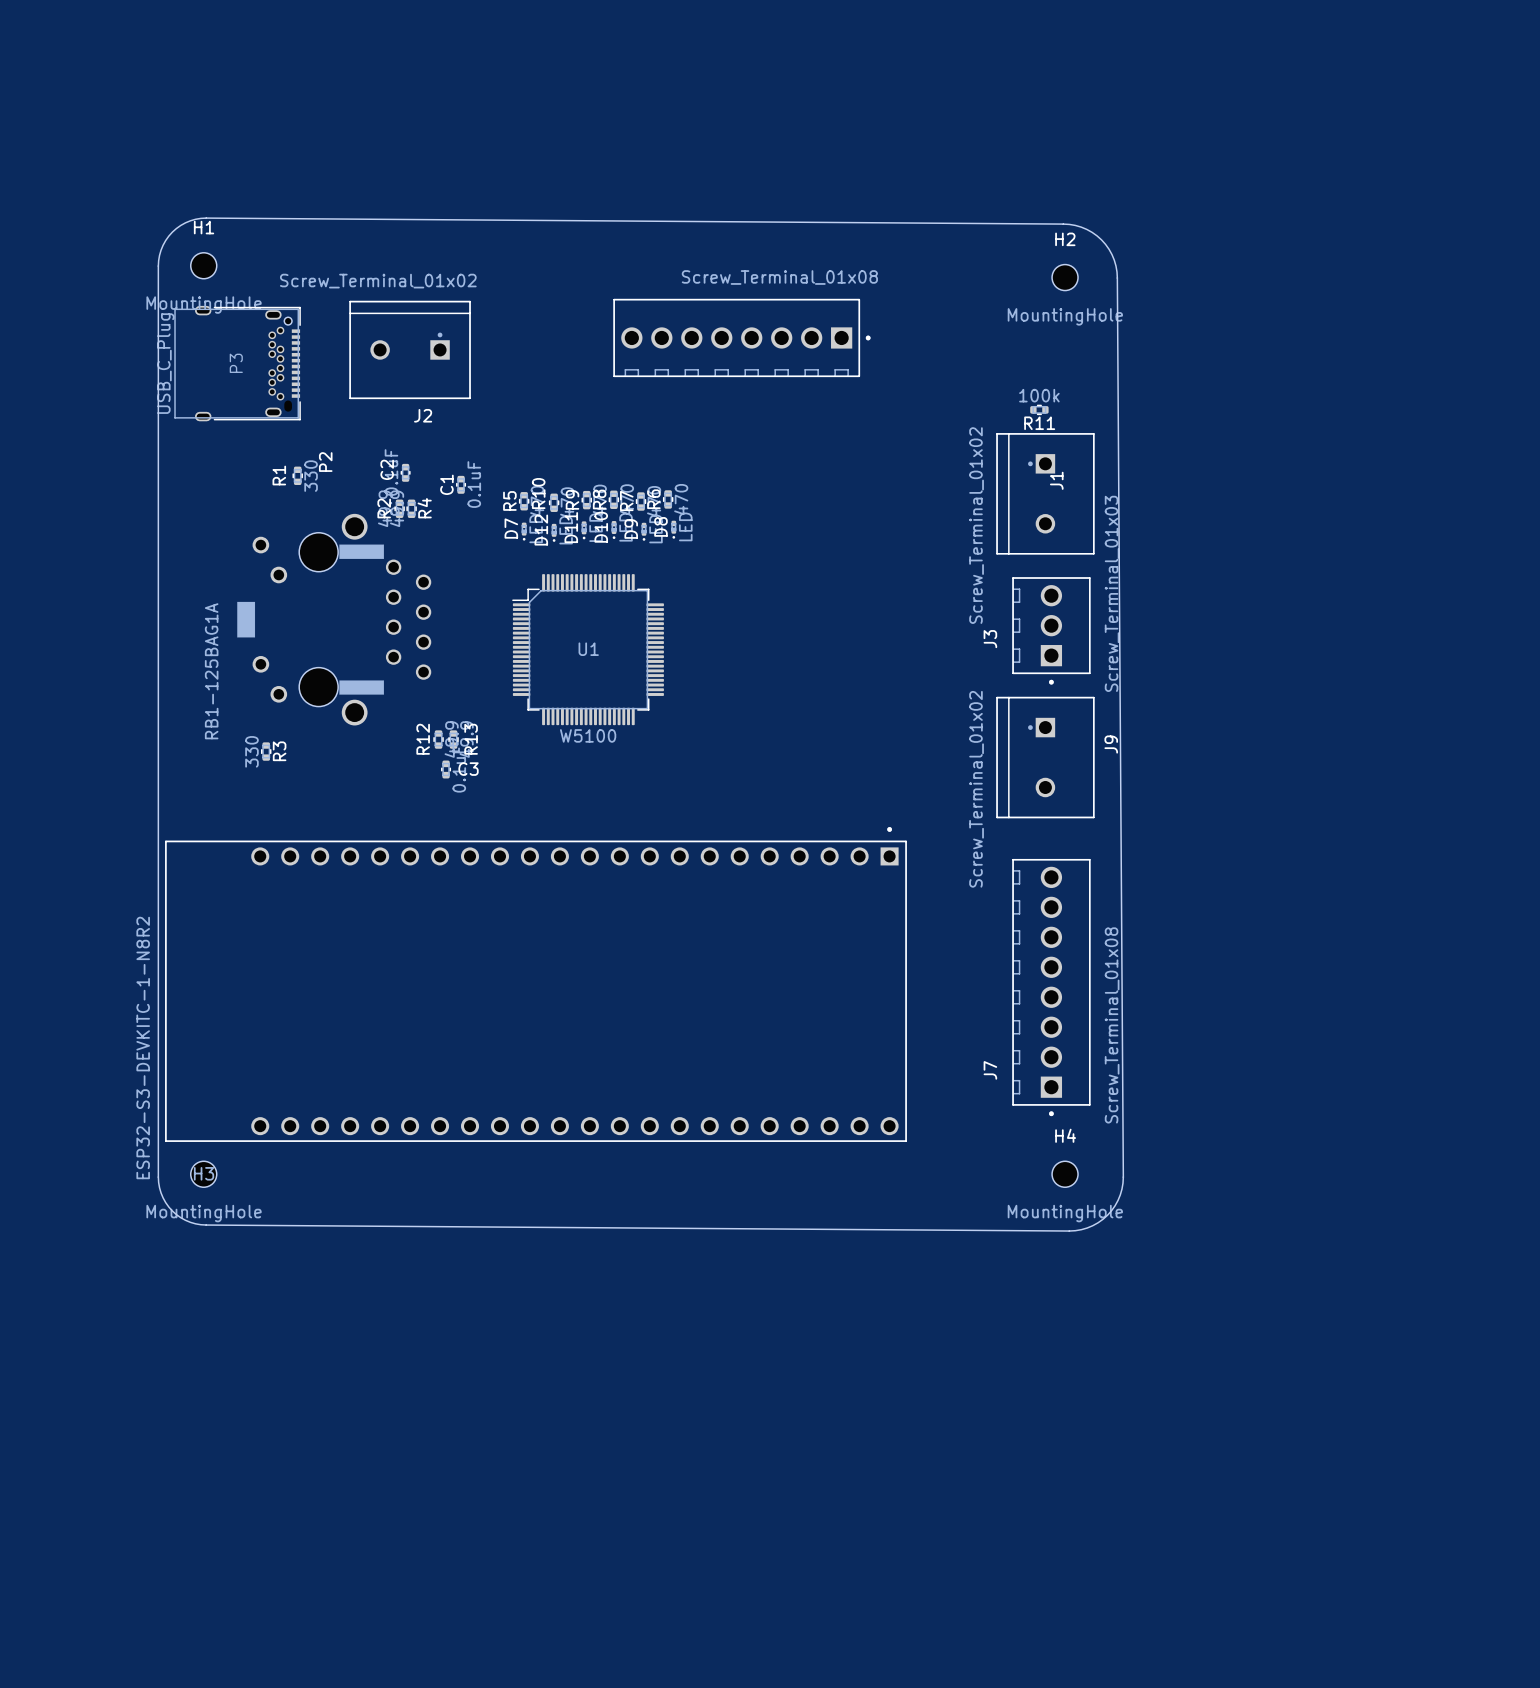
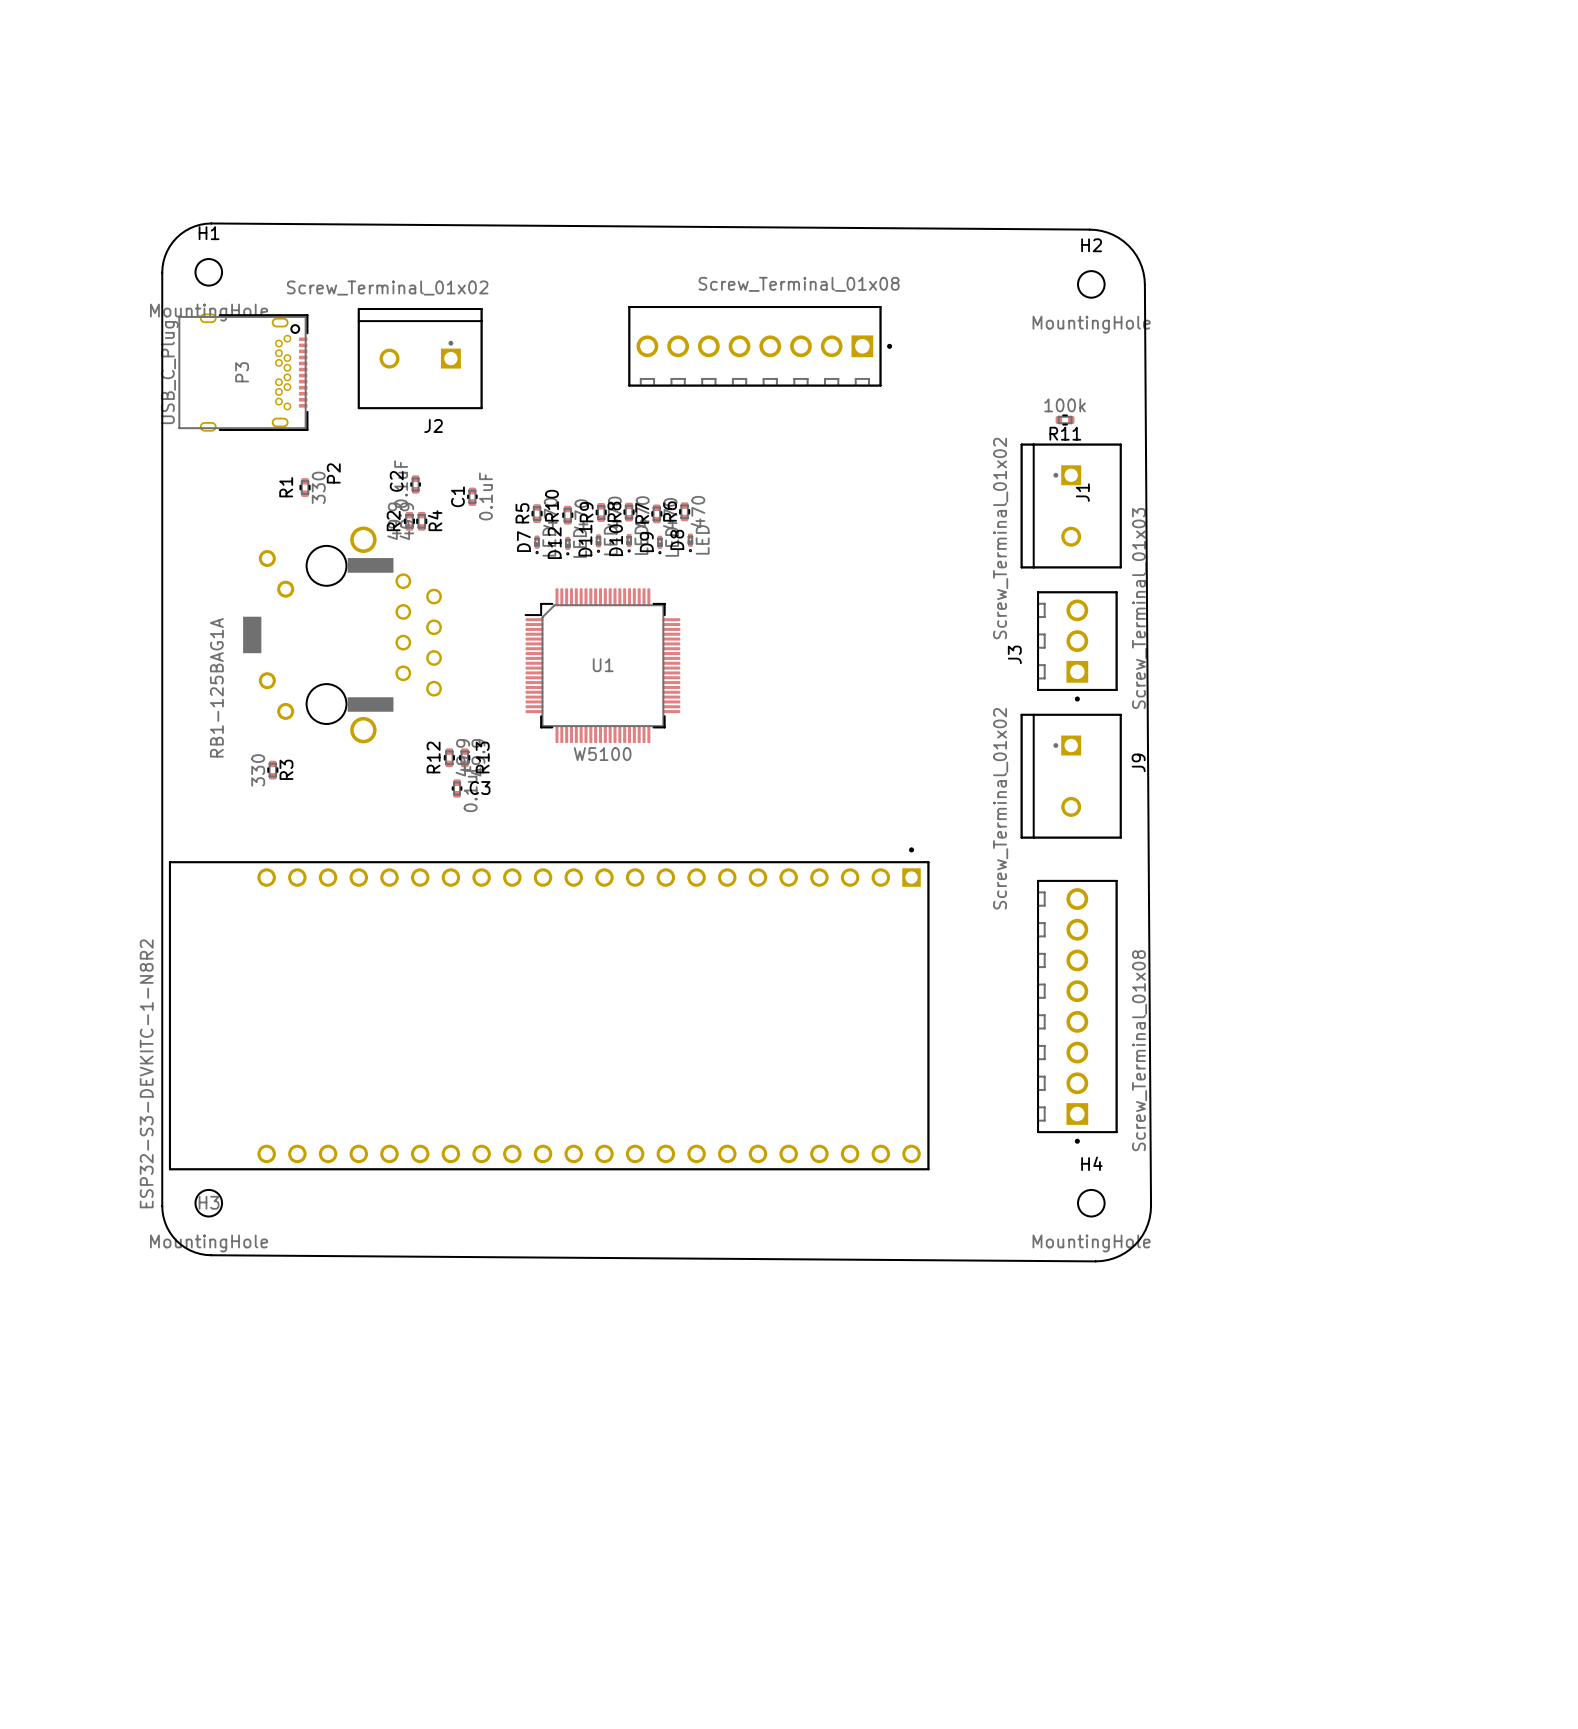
J7 name: J7 (990, 1070) -> none

